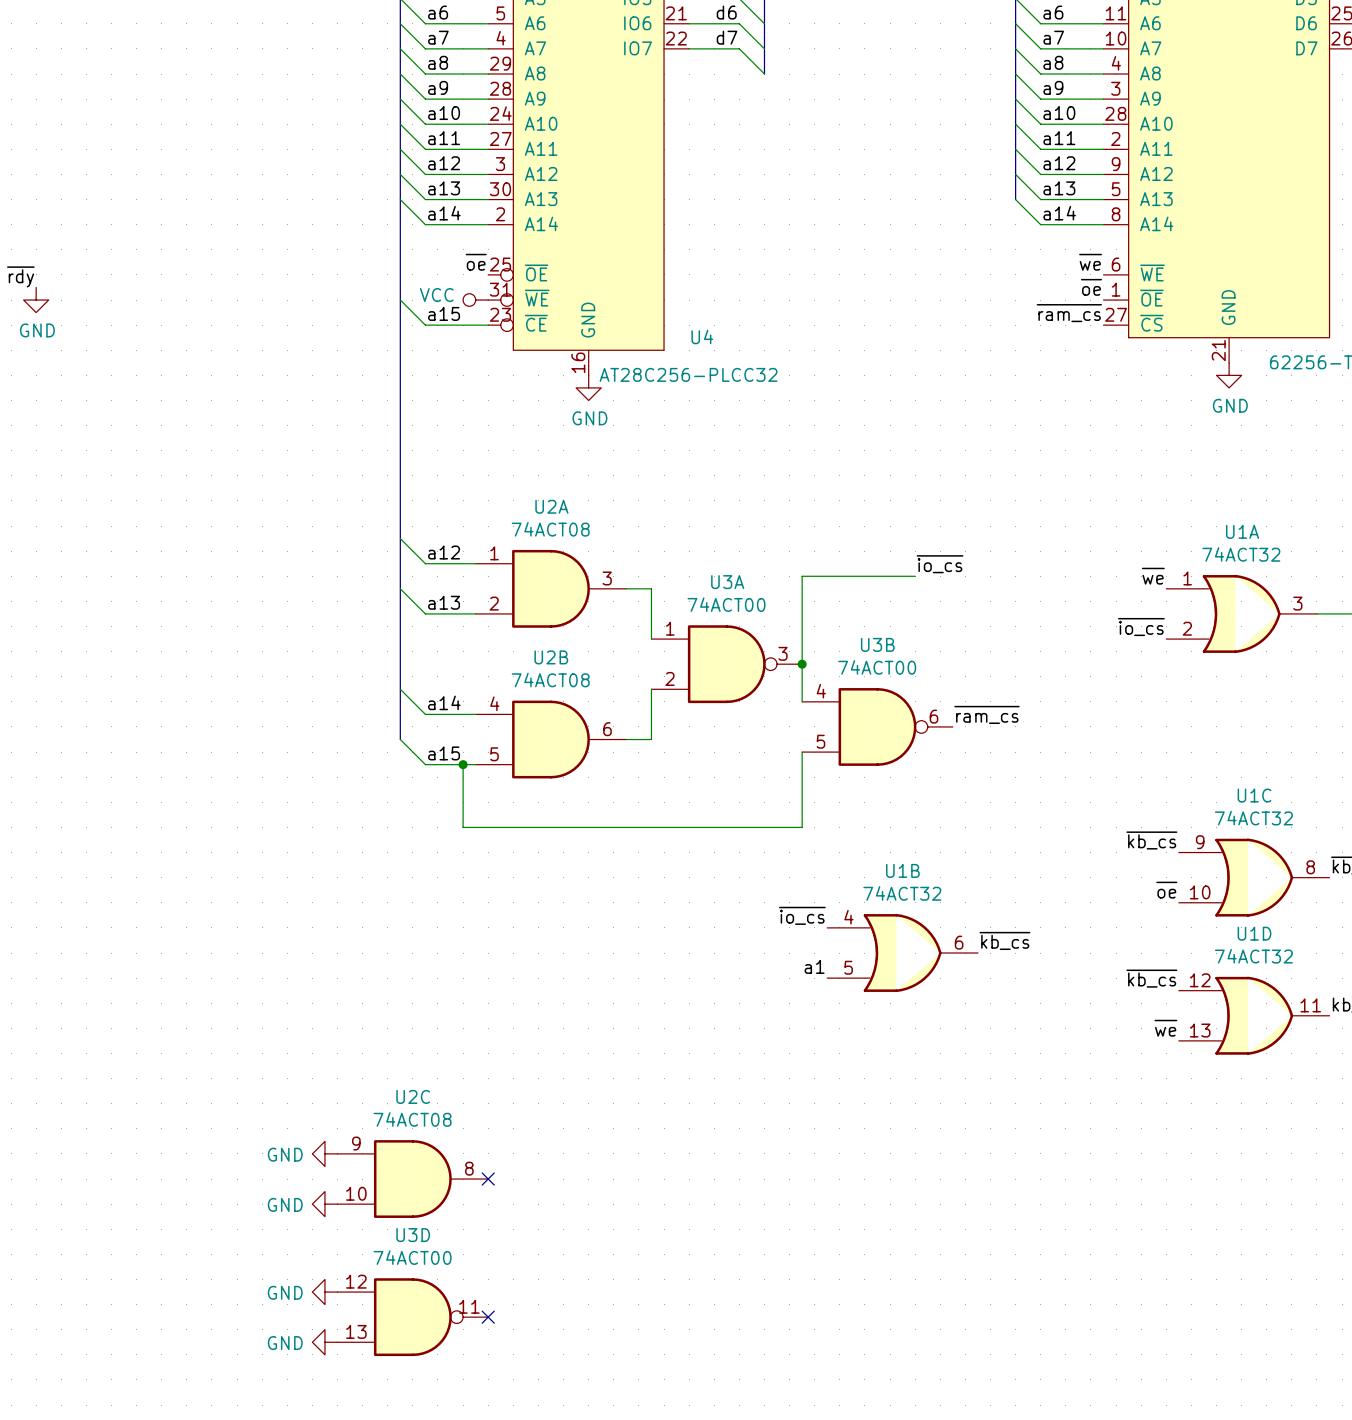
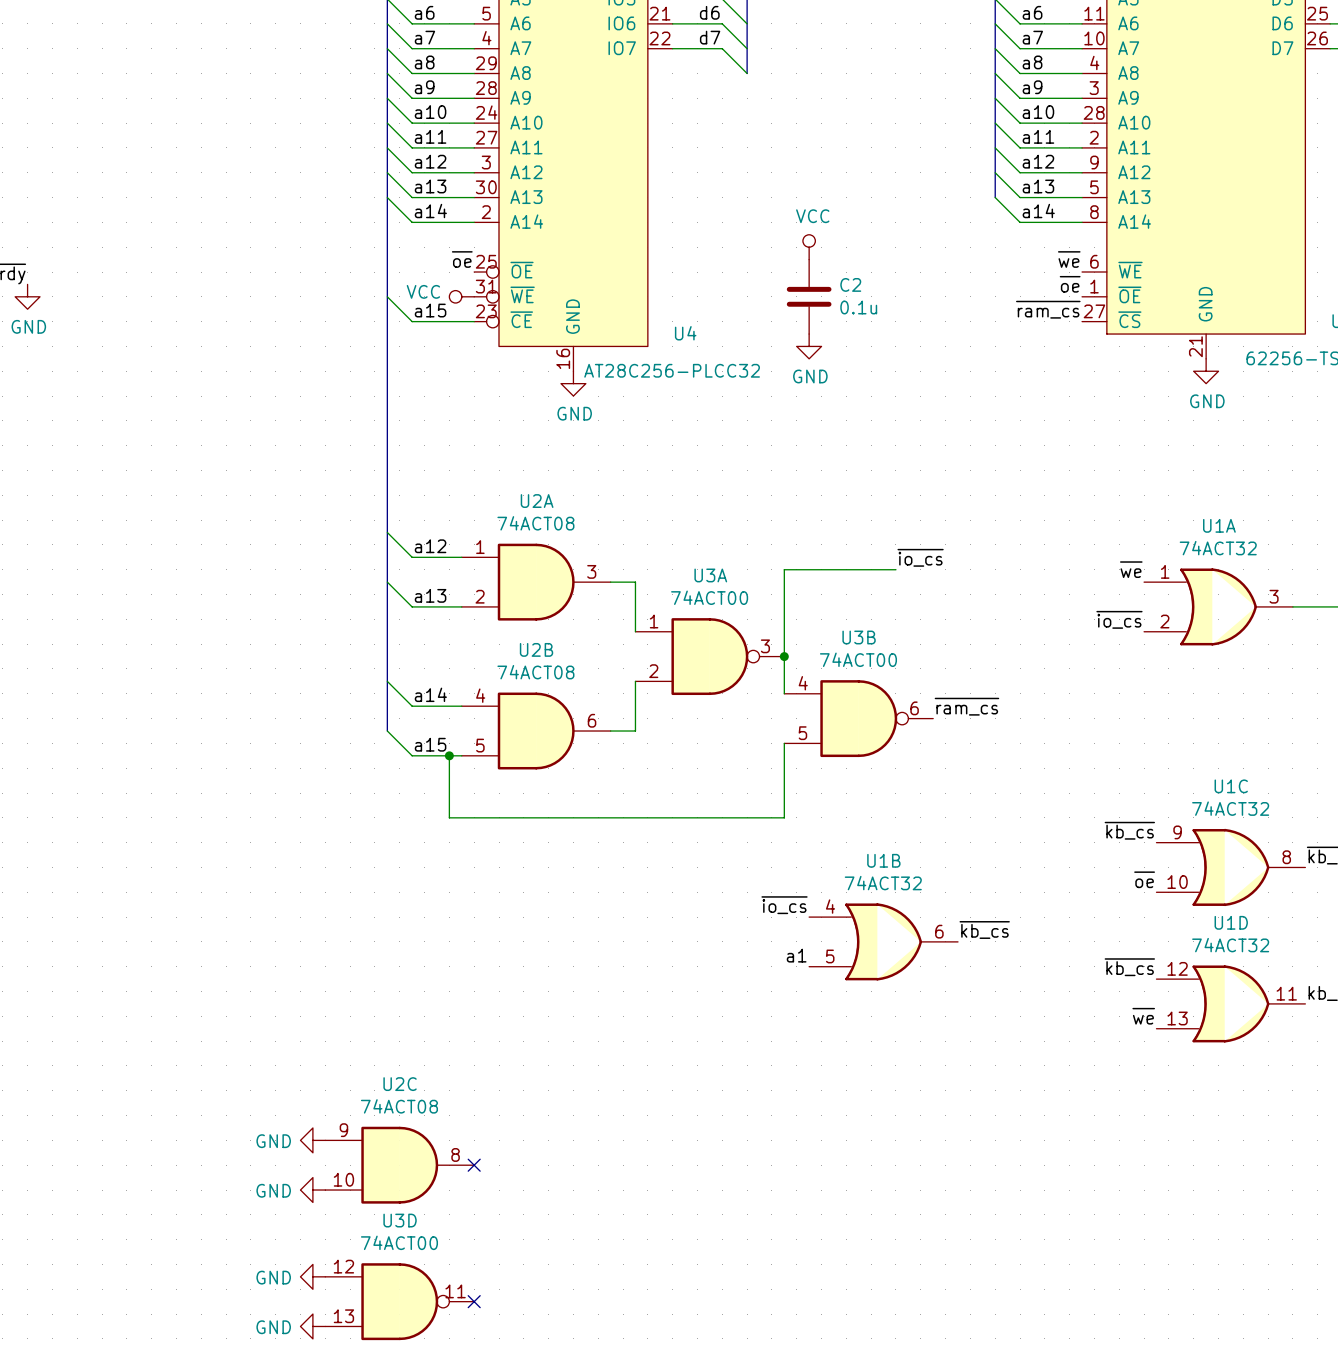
power symbol: none -> VCC (809, 247)
C2: none -> 0.1u (809, 296)
power symbol: none -> GND (809, 346)

